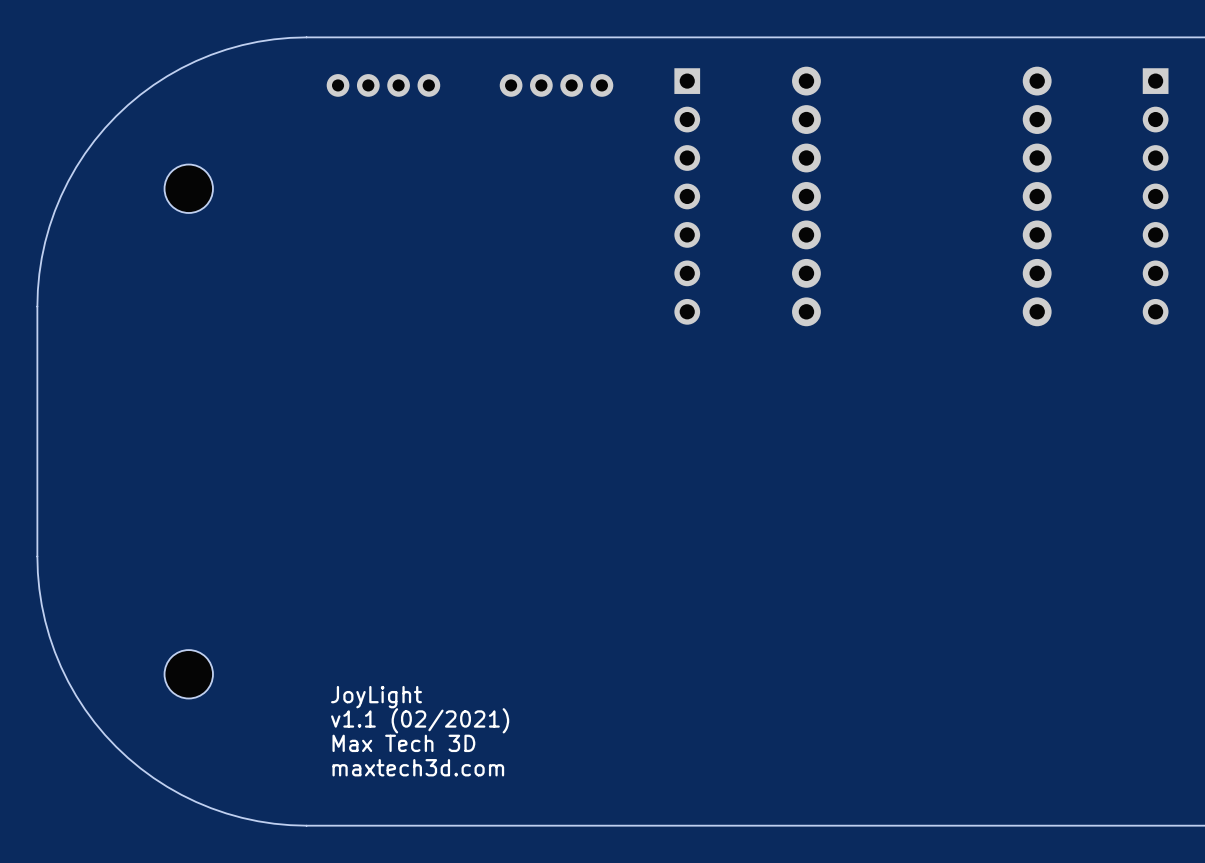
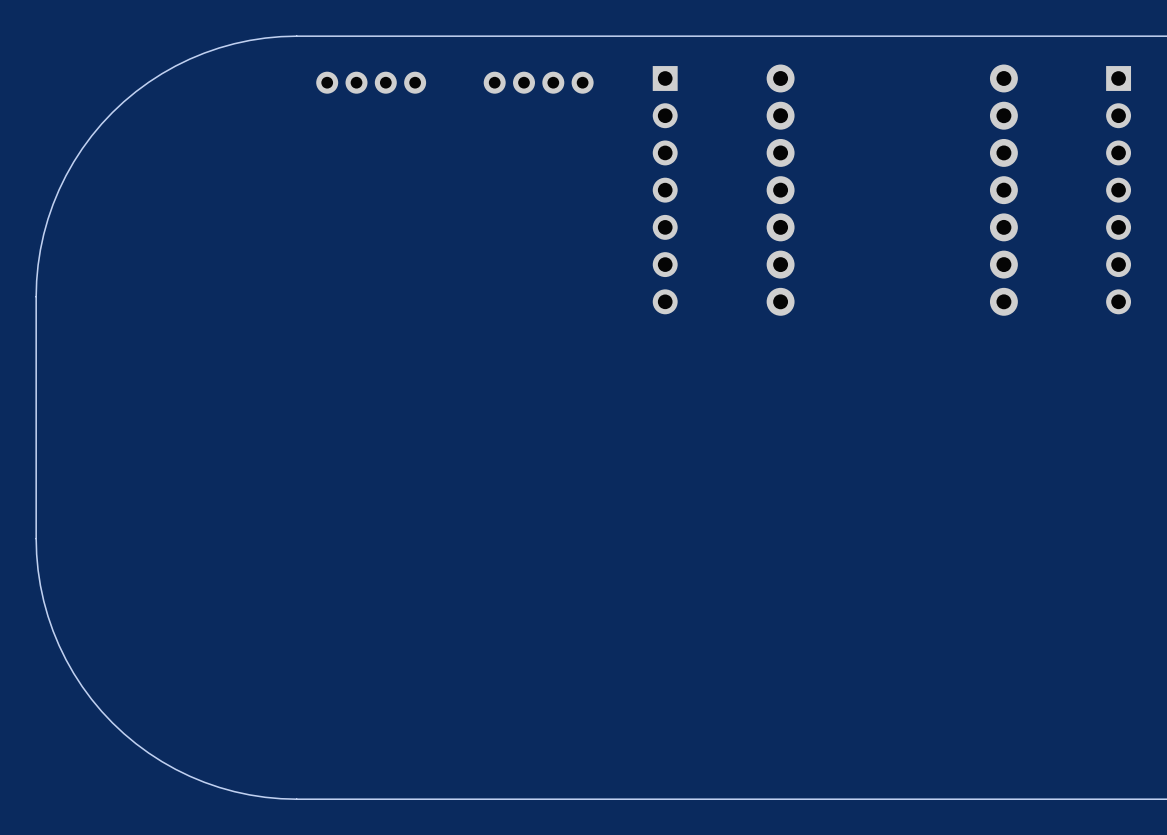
part: (188, 188) -> none
part: (188, 674) -> none
text: JoyLight (376, 697) -> none
text: v1.1 (02/2021) (420, 720) -> none
text: Max Tech 3D (403, 743) -> none
text: maxtech3d.com (418, 767) -> none

